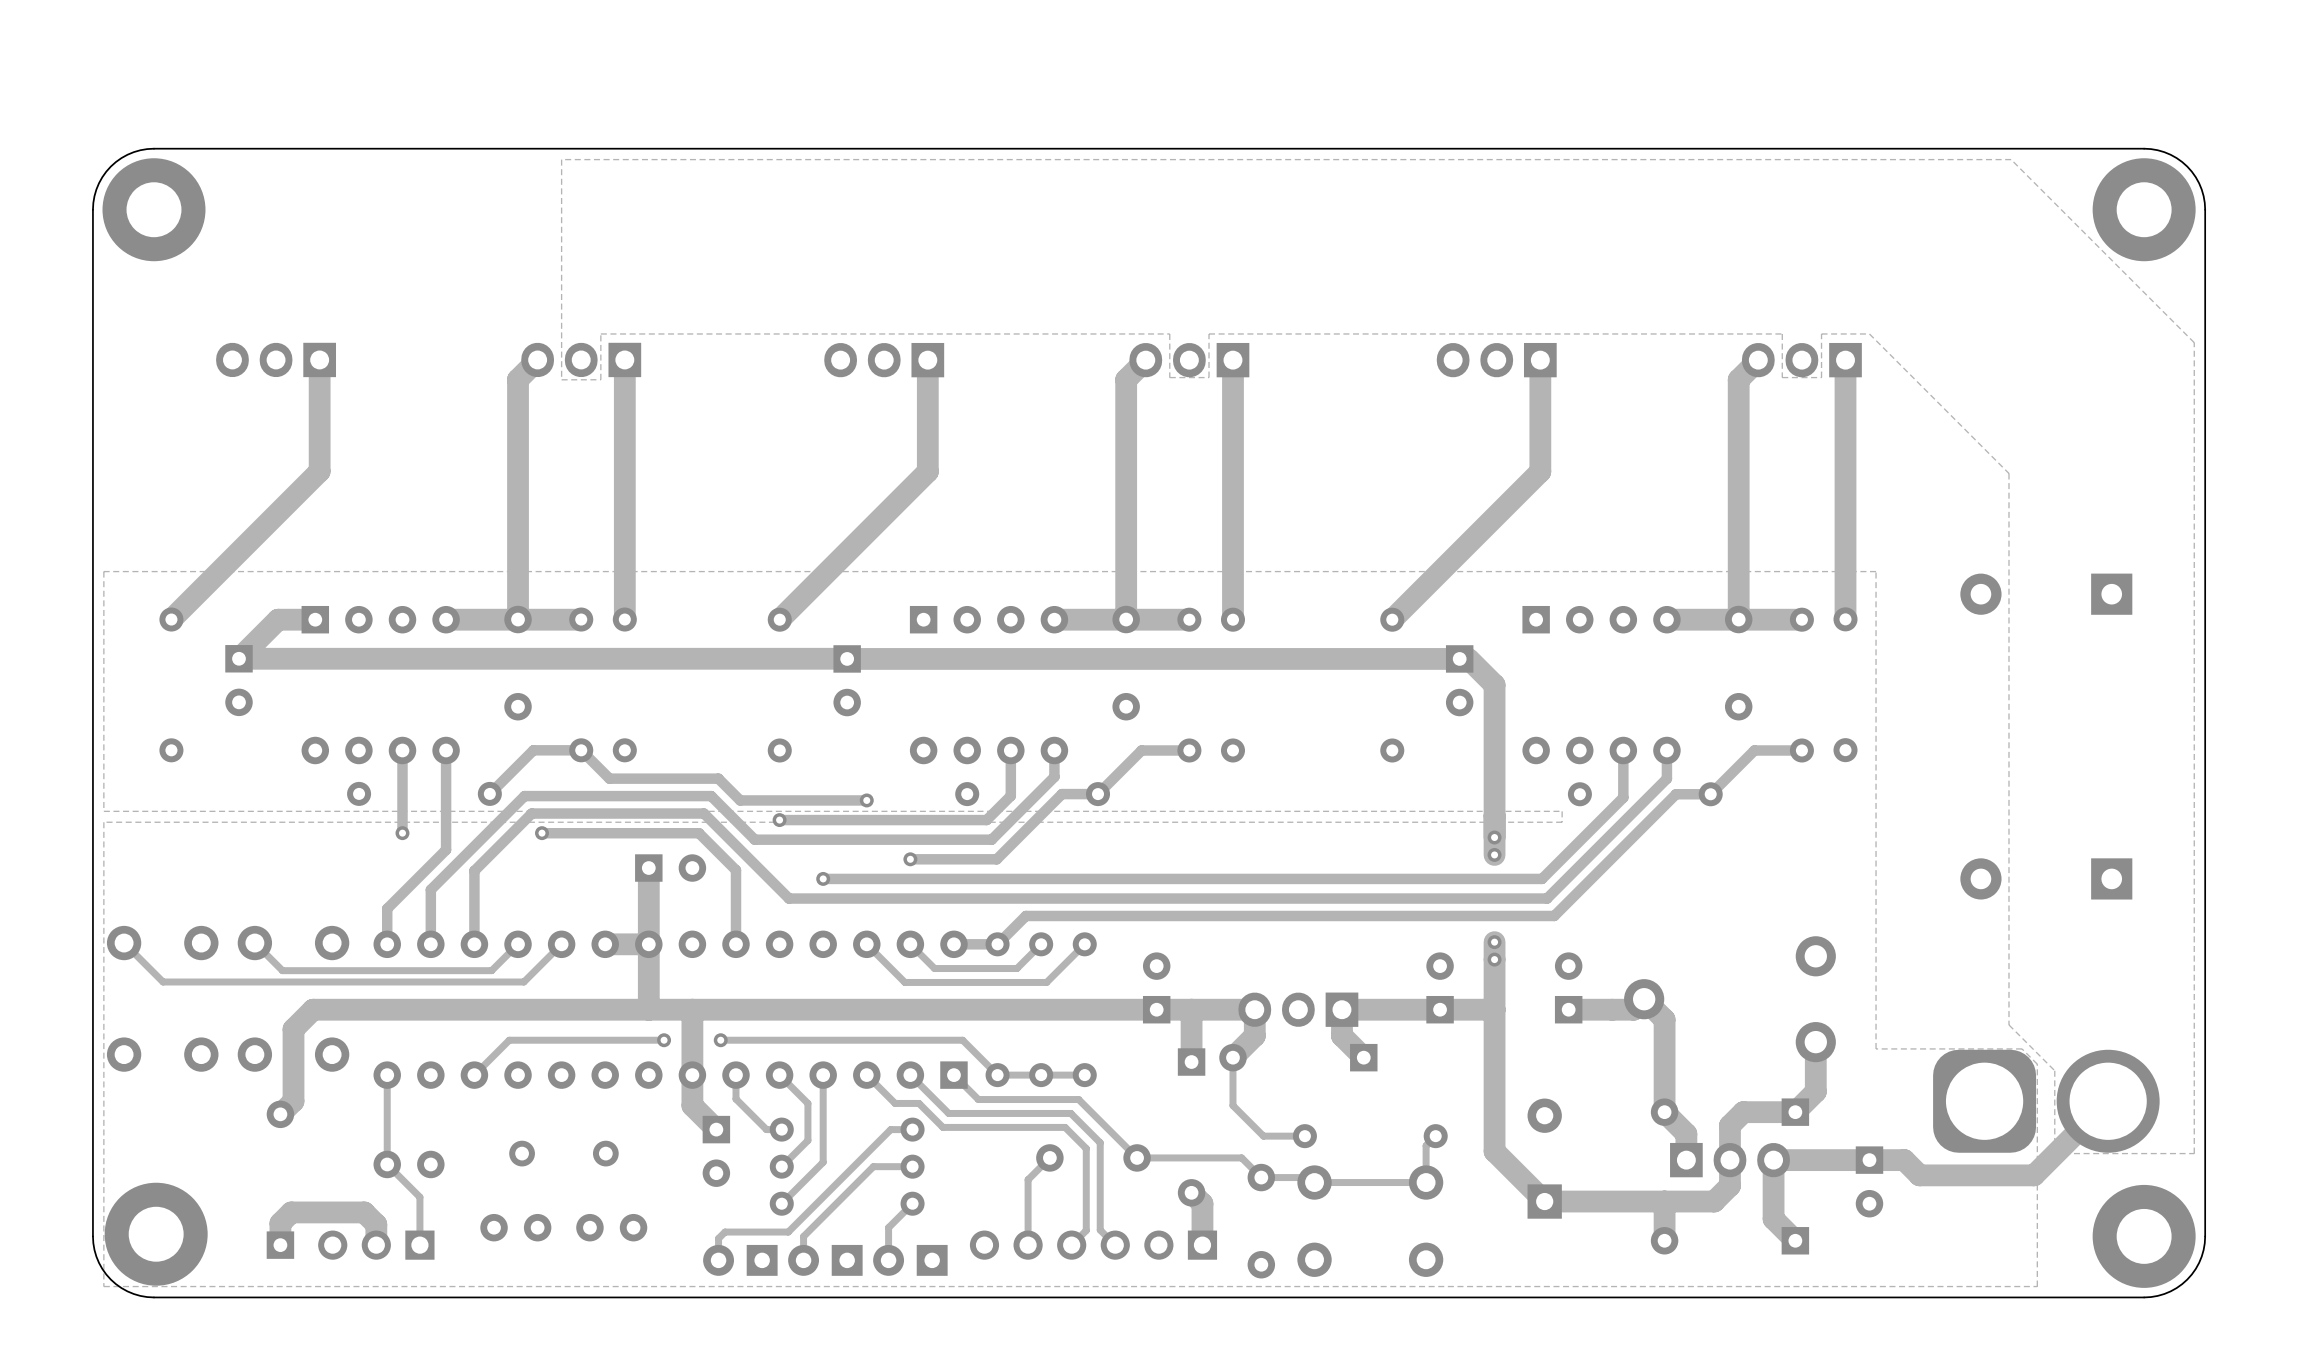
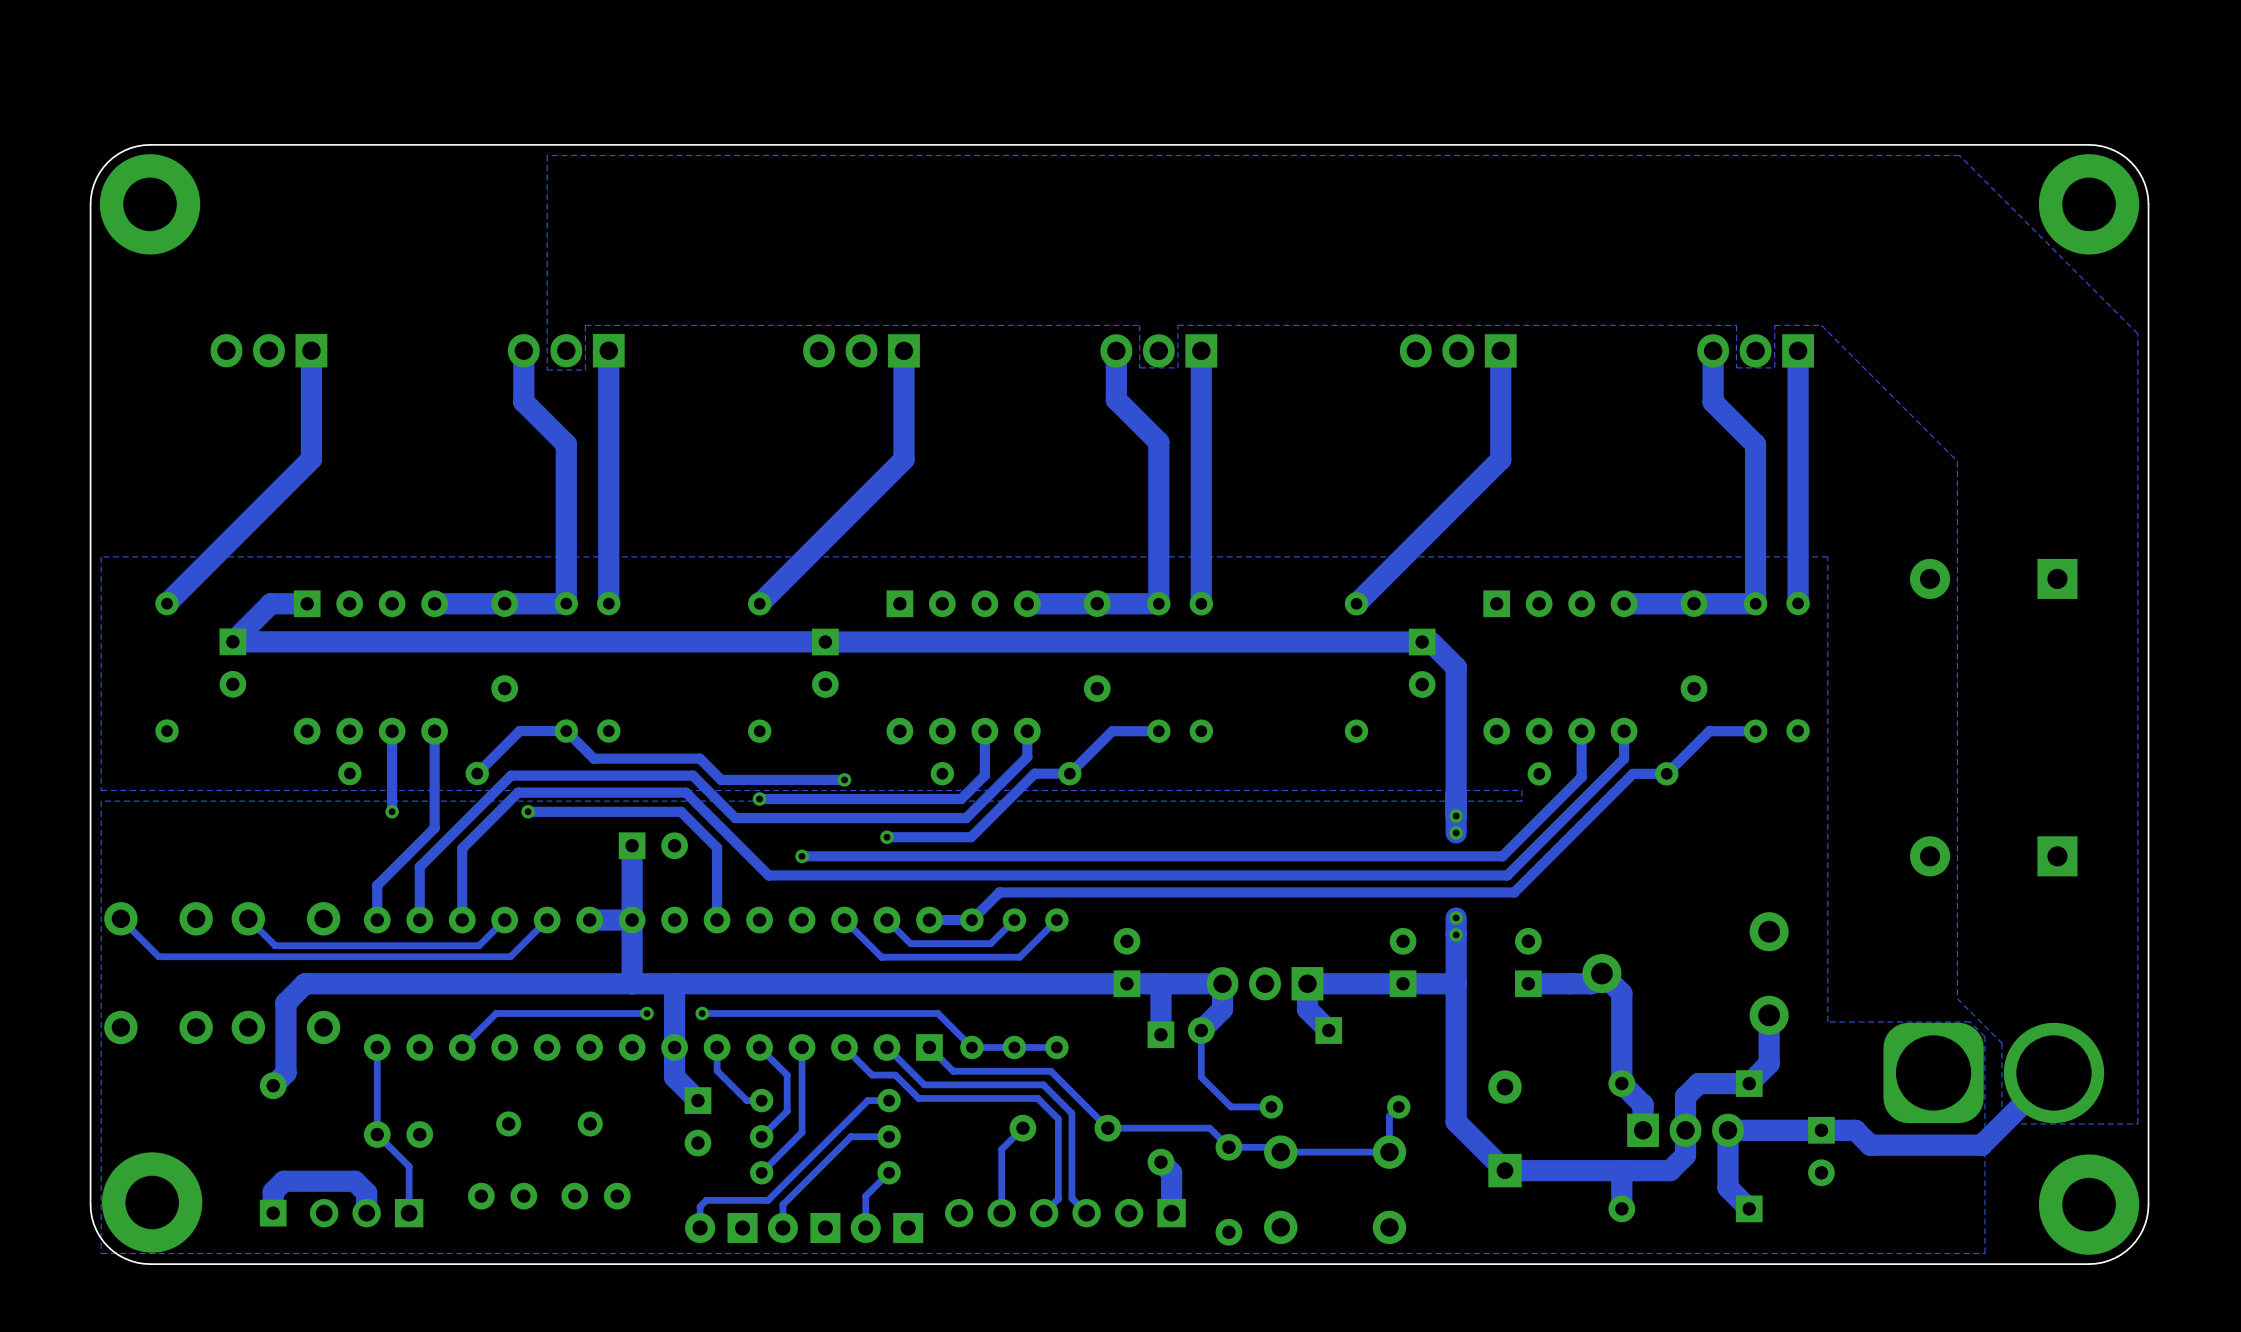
track: (537, 359) (518, 379) (518, 619) -> (523, 350) (523, 401) (566, 444) (566, 603)
track: (1145, 360) (1126, 379) (1126, 619) -> (1116, 350) (1116, 399) (1158, 442) (1158, 603)
track: (1758, 360) (1738, 379) (1738, 619) -> (1713, 350) (1713, 402) (1755, 444) (1755, 603)

